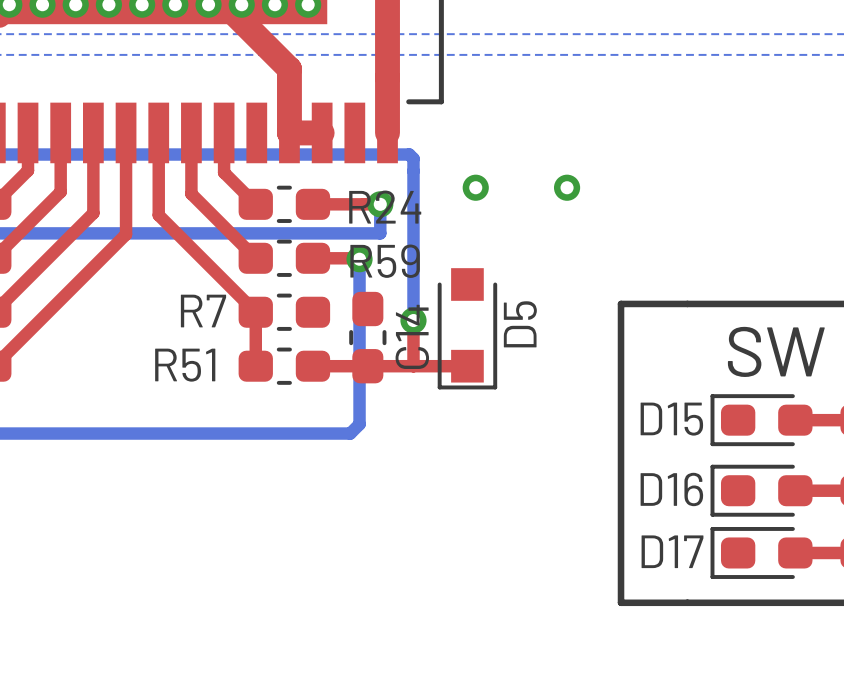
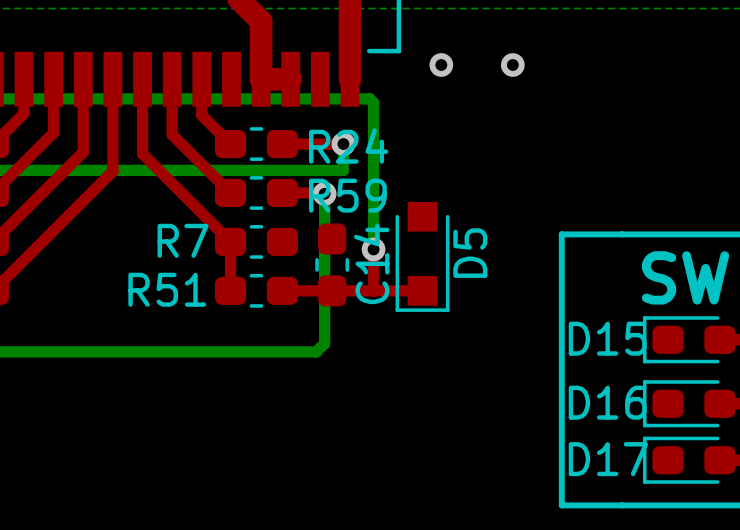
via: none -> (441, 65)
via: none -> (512, 65)
via: (475, 187) -> none
via: (567, 187) -> none

